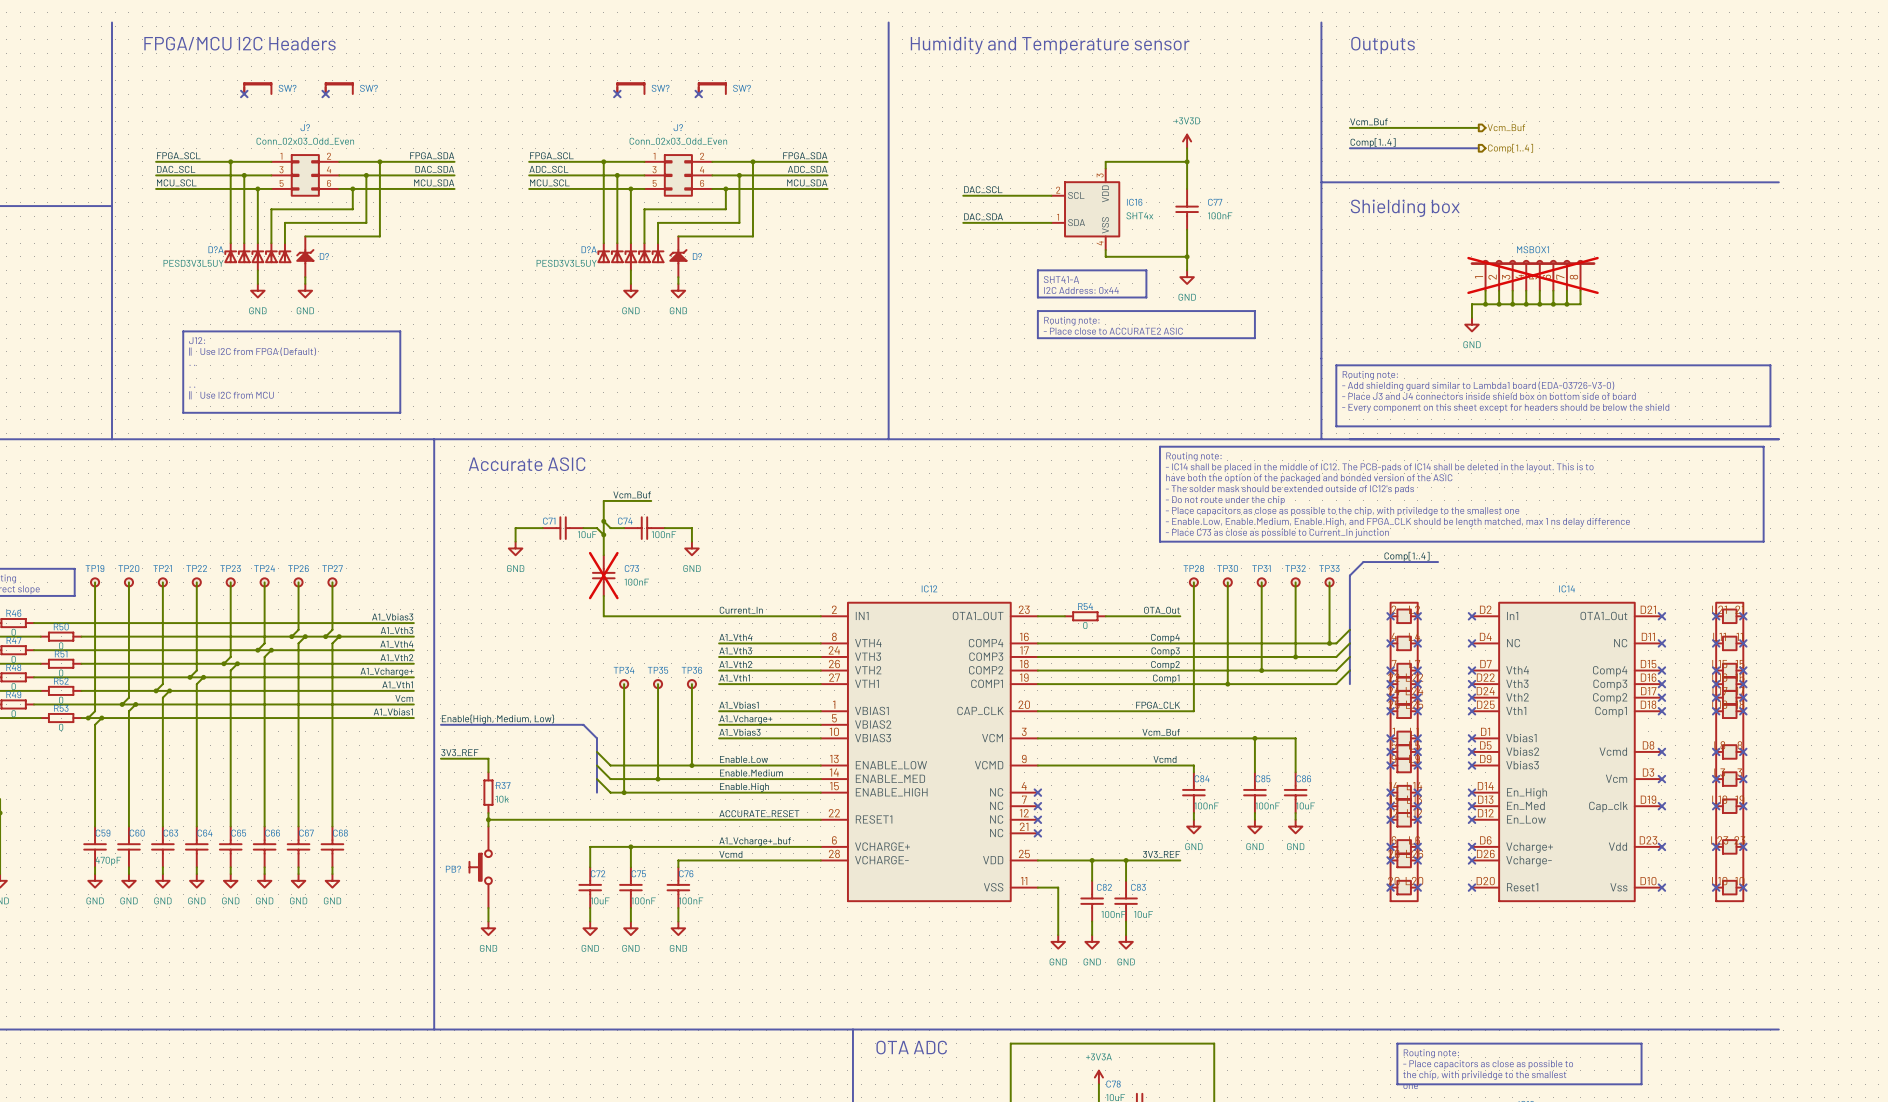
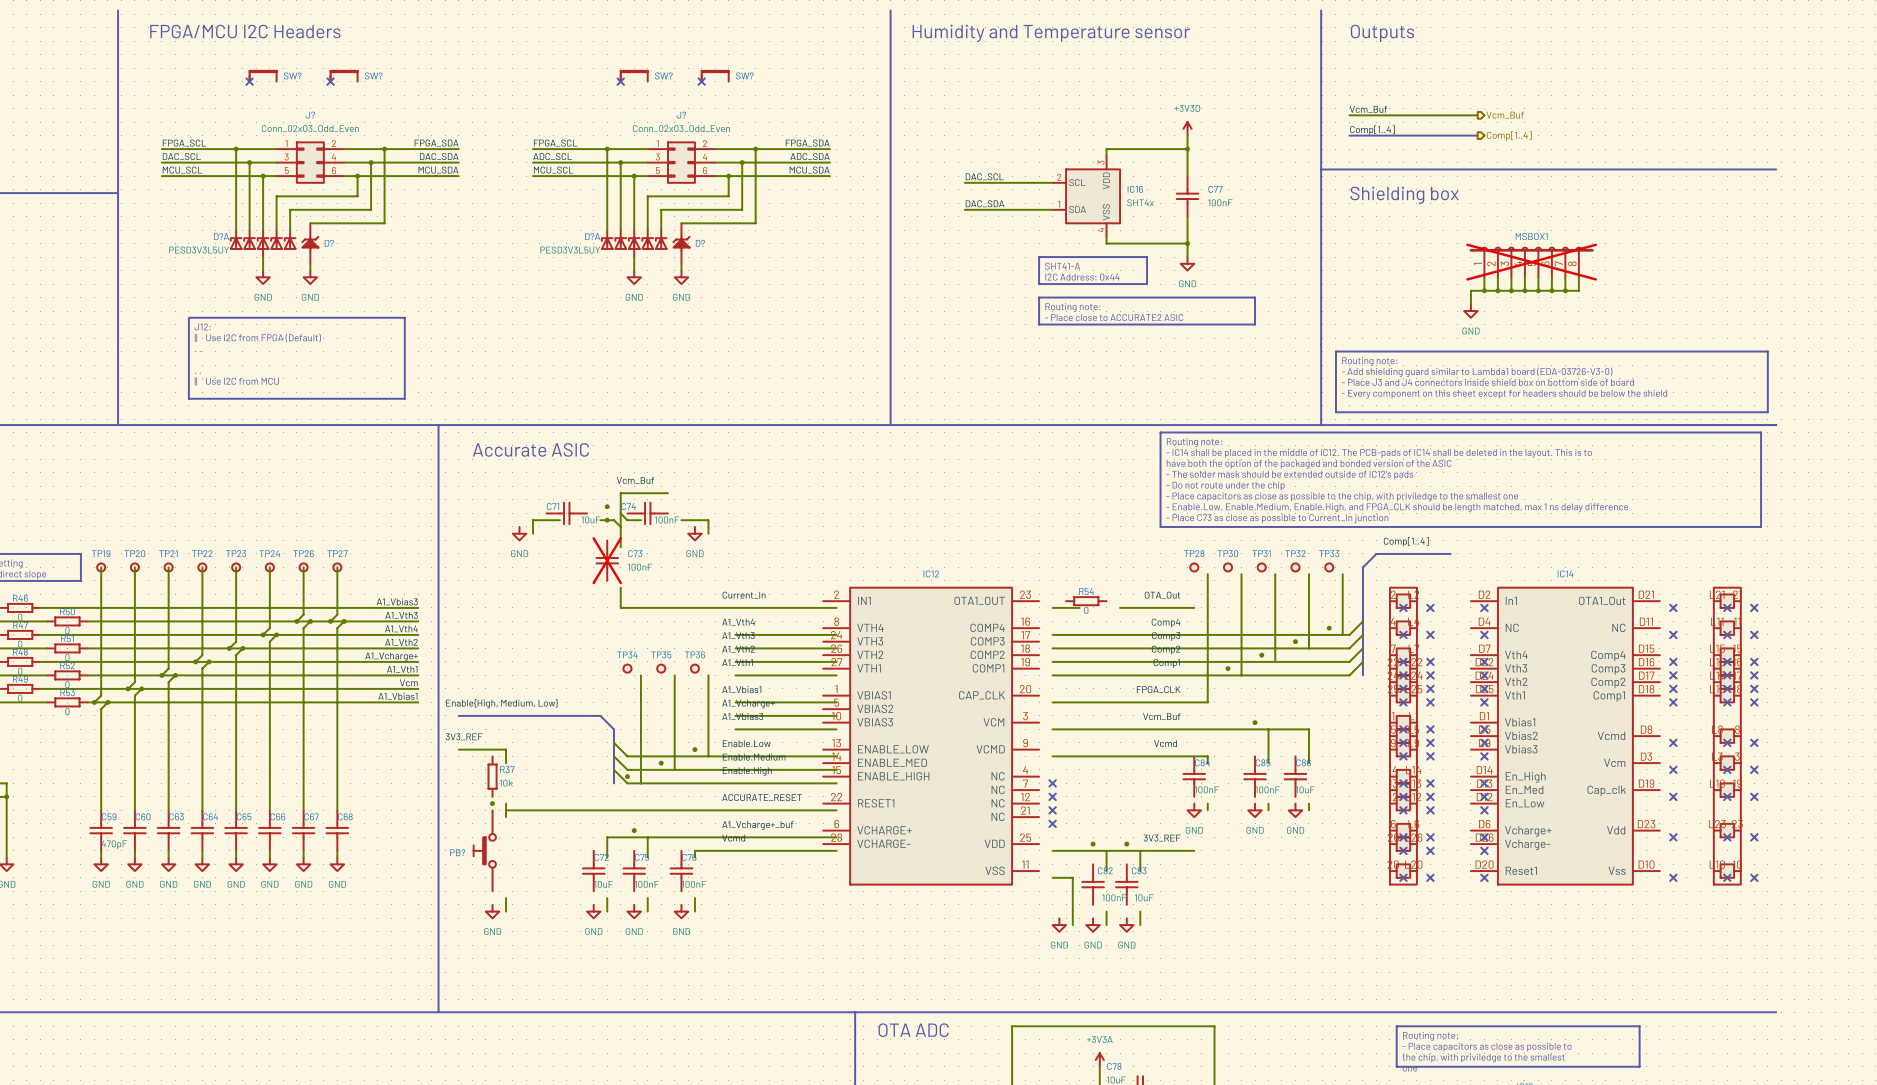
wire: (651, 500) (603, 500) (603, 555) -> (667, 493) (620, 493) (620, 547)
wire: (603, 521) (610, 528) (624, 528) -> (620, 513) (627, 520) (640, 520)
wire: (542, 528) (515, 528) (515, 541) -> (560, 520) (533, 520) (533, 533)
wire: (583, 528) (596, 528) (603, 534) -> (600, 520) (613, 520) (620, 526)
wire: (664, 528) (691, 528) (691, 541) -> (681, 520) (708, 520) (708, 533)
bus: (1438, 562) (1363, 562) (1349, 575) (1349, 684) -> (1450, 553) (1376, 553) (1362, 567) (1362, 675)
wire: (1193, 582) (1193, 711) (1037, 711) -> (1207, 574) (1207, 702) (1052, 702)
wire: (1227, 582) (1227, 684) -> (1241, 574) (1241, 675)
wire: (1261, 582) (1261, 670) -> (1275, 574) (1275, 661)
wire: (1295, 582) (1295, 656) -> (1308, 574) (1308, 648)
wire: (1329, 582) (1329, 643) -> (1342, 574) (1342, 634)
wire: (603, 595) (603, 616) (820, 616) -> (620, 587) (620, 607) (836, 607)
wire: (1037, 616) (1065, 616) -> (1052, 607) (1079, 607)
wire: (1105, 616) (1180, 616) -> (1120, 607) (1194, 607)
no-connect mark: (1390, 616) -> none
no-connect mark: (1417, 616) -> none
no-connect mark: (1471, 616) -> none
no-connect mark: (1661, 616) -> none
no-connect mark: (1716, 616) -> none
no-connect mark: (1743, 616) -> none
no-connect mark: none -> (1403, 607)
no-connect mark: none -> (1430, 607)
no-connect mark: none -> (1484, 607)
no-connect mark: none -> (1673, 607)
no-connect mark: none -> (1727, 607)
no-connect mark: none -> (1754, 607)
wire: (1349, 629) (1336, 643) (1037, 643) -> (1362, 621) (1349, 634) (1052, 634)
wire: (719, 643) (820, 643) -> (735, 634) (836, 634)
wire: (1349, 643) (1336, 656) (1037, 656) -> (1362, 634) (1349, 648) (1052, 648)
no-connect mark: (1390, 643) -> none
no-connect mark: (1417, 643) -> none
no-connect mark: (1471, 643) -> none
no-connect mark: (1661, 643) -> none
no-connect mark: (1716, 643) -> none
no-connect mark: (1743, 643) -> none
no-connect mark: none -> (1403, 634)
no-connect mark: none -> (1430, 634)
no-connect mark: none -> (1484, 634)
no-connect mark: none -> (1673, 634)
no-connect mark: none -> (1727, 634)
no-connect mark: none -> (1754, 634)
wire: (719, 656) (820, 656) -> (735, 648) (836, 648)
wire: (1349, 656) (1336, 670) (1037, 670) -> (1362, 648) (1349, 661) (1052, 661)
wire: (719, 670) (820, 670) -> (735, 661) (836, 661)
wire: (1349, 670) (1336, 684) (1037, 684) -> (1362, 661) (1349, 675) (1052, 675)
no-connect mark: (1390, 670) -> none
no-connect mark: (1417, 670) -> none
no-connect mark: (1471, 670) -> none
no-connect mark: (1661, 670) -> none
no-connect mark: (1716, 670) -> none
no-connect mark: (1743, 670) -> none
no-connect mark: none -> (1403, 661)
no-connect mark: none -> (1430, 661)
no-connect mark: none -> (1484, 661)
no-connect mark: none -> (1673, 661)
no-connect mark: none -> (1727, 661)
no-connect mark: none -> (1754, 661)
wire: (624, 684) (624, 792) -> (640, 675) (640, 783)
wire: (658, 684) (658, 779) -> (674, 675) (674, 769)
wire: (691, 684) (691, 765) -> (708, 675) (708, 756)
wire: (719, 684) (820, 684) -> (735, 675) (836, 675)
no-connect mark: (1390, 684) -> none
no-connect mark: (1417, 684) -> none
no-connect mark: (1471, 684) -> none
no-connect mark: (1661, 684) -> none
no-connect mark: (1716, 684) -> none
no-connect mark: (1743, 684) -> none
no-connect mark: none -> (1403, 675)
no-connect mark: none -> (1430, 675)
no-connect mark: none -> (1484, 675)
no-connect mark: none -> (1673, 675)
no-connect mark: none -> (1727, 675)
no-connect mark: none -> (1754, 675)
no-connect mark: (1390, 697) -> none
no-connect mark: (1417, 697) -> none
no-connect mark: (1471, 697) -> none
no-connect mark: (1661, 697) -> none
no-connect mark: (1716, 697) -> none
no-connect mark: (1743, 697) -> none
no-connect mark: none -> (1403, 688)
no-connect mark: none -> (1430, 688)
no-connect mark: none -> (1484, 688)
no-connect mark: none -> (1673, 688)
no-connect mark: none -> (1727, 688)
no-connect mark: none -> (1754, 688)
wire: (719, 711) (820, 711) -> (735, 702) (836, 702)
no-connect mark: (1390, 711) -> none
no-connect mark: (1417, 711) -> none
no-connect mark: (1471, 711) -> none
no-connect mark: (1661, 711) -> none
no-connect mark: (1716, 711) -> none
no-connect mark: (1743, 711) -> none
no-connect mark: none -> (1403, 702)
no-connect mark: none -> (1430, 702)
no-connect mark: none -> (1484, 702)
no-connect mark: none -> (1673, 702)
no-connect mark: none -> (1727, 702)
no-connect mark: none -> (1754, 702)
bus: (440, 724) (583, 724) (596, 738) (596, 792) -> (458, 715) (600, 715) (613, 729) (613, 783)
wire: (719, 724) (820, 724) -> (735, 715) (836, 715)
wire: (719, 738) (820, 738) -> (735, 729) (836, 729)
wire: (1037, 738) (1295, 738) (1295, 772) -> (1052, 729) (1308, 729) (1308, 763)
wire: (1254, 738) (1254, 772) -> (1268, 729) (1268, 763)
no-connect mark: (1390, 738) -> none
no-connect mark: (1417, 738) -> none
no-connect mark: (1471, 738) -> none
no-connect mark: none -> (1403, 729)
no-connect mark: none -> (1430, 729)
no-connect mark: none -> (1484, 729)
wire: (596, 751) (610, 765) (820, 765) -> (613, 742) (627, 756) (836, 756)
no-connect mark: (1390, 751) -> none
no-connect mark: (1417, 751) -> none
no-connect mark: (1471, 751) -> none
no-connect mark: (1661, 751) -> none
no-connect mark: (1716, 751) -> none
no-connect mark: (1743, 751) -> none
wire: (440, 758) (488, 758) (488, 772) -> (458, 749) (506, 749) (506, 763)
no-connect mark: none -> (1403, 742)
no-connect mark: none -> (1430, 742)
no-connect mark: none -> (1484, 742)
no-connect mark: none -> (1673, 742)
no-connect mark: none -> (1727, 742)
no-connect mark: none -> (1754, 742)
wire: (596, 765) (610, 779) (820, 779) -> (613, 756) (627, 769) (836, 769)
wire: (1037, 765) (1193, 765) (1193, 772) -> (1052, 756) (1207, 756) (1207, 763)
no-connect mark: (1390, 765) -> none
no-connect mark: (1417, 765) -> none
no-connect mark: (1471, 765) -> none
no-connect mark: none -> (1403, 756)
no-connect mark: none -> (1430, 756)
no-connect mark: none -> (1484, 756)
wire: (596, 779) (610, 792) (820, 792) -> (613, 769) (627, 783) (836, 783)
no-connect mark: (1661, 779) -> none
no-connect mark: (1716, 779) -> none
no-connect mark: (1743, 779) -> none
no-connect mark: none -> (1673, 769)
no-connect mark: none -> (1727, 769)
no-connect mark: none -> (1754, 769)
no-connect mark: (1037, 792) -> none
no-connect mark: (1390, 792) -> none
no-connect mark: (1417, 792) -> none
no-connect mark: (1471, 792) -> none
no-connect mark: none -> (1052, 783)
no-connect mark: none -> (1403, 783)
no-connect mark: none -> (1430, 783)
no-connect mark: none -> (1484, 783)
no-connect mark: (1037, 806) -> none
no-connect mark: (1390, 806) -> none
no-connect mark: (1417, 806) -> none
no-connect mark: (1471, 806) -> none
no-connect mark: (1661, 806) -> none
no-connect mark: (1716, 806) -> none
no-connect mark: (1743, 806) -> none
wire: (488, 812) (488, 826) -> (506, 803) (506, 817)
no-connect mark: none -> (1052, 796)
wire: (1193, 812) (1193, 819) -> (1207, 803) (1207, 810)
wire: (1254, 812) (1254, 819) -> (1268, 803) (1268, 810)
wire: (1295, 812) (1295, 819) -> (1308, 803) (1308, 810)
no-connect mark: none -> (1403, 796)
no-connect mark: none -> (1430, 796)
no-connect mark: none -> (1484, 796)
no-connect mark: none -> (1673, 796)
no-connect mark: none -> (1727, 796)
no-connect mark: none -> (1754, 796)
wire: (488, 819) (820, 819) -> (506, 810) (836, 810)
no-connect mark: (1037, 819) -> none
no-connect mark: (1390, 819) -> none
no-connect mark: (1417, 819) -> none
no-connect mark: (1471, 819) -> none
no-connect mark: none -> (1052, 810)
no-connect mark: none -> (1403, 810)
no-connect mark: none -> (1430, 810)
no-connect mark: none -> (1484, 810)
no-connect mark: (1037, 833) -> none
no-connect mark: none -> (1052, 823)
wire: (630, 846) (630, 867) -> (647, 837) (647, 857)
wire: (820, 846) (590, 846) (590, 867) -> (836, 837) (607, 837) (607, 857)
no-connect mark: (1390, 846) -> none
no-connect mark: (1417, 846) -> none
no-connect mark: (1471, 846) -> none
no-connect mark position: (1661, 846) -> (1673, 837)
no-connect mark: (1716, 846) -> none
no-connect mark: (1743, 846) -> none
no-connect mark: none -> (1403, 837)
no-connect mark: none -> (1430, 837)
no-connect mark: none -> (1484, 837)
no-connect mark: none -> (1727, 837)
no-connect mark: none -> (1754, 837)
wire: (820, 860) (678, 860) (678, 867) -> (836, 850) (694, 850) (694, 857)
wire: (1037, 860) (1180, 860) -> (1052, 850) (1194, 850)
wire: (1092, 860) (1092, 880) -> (1106, 850) (1106, 871)
wire: (1126, 860) (1126, 880) -> (1140, 850) (1140, 871)
no-connect mark: (1390, 860) -> none
no-connect mark: (1417, 860) -> none
no-connect mark: (1471, 860) -> none
no-connect mark: none -> (1403, 850)
no-connect mark: none -> (1430, 850)
no-connect mark: none -> (1484, 850)
wire: (1037, 887) (1058, 887) (1058, 935) -> (1052, 877) (1072, 877) (1072, 925)
no-connect mark: (1390, 887) -> none
no-connect mark: (1417, 887) -> none
no-connect mark: (1471, 887) -> none
no-connect mark position: (1661, 887) -> (1673, 877)
no-connect mark: (1716, 887) -> none
no-connect mark: (1743, 887) -> none
no-connect mark: none -> (1403, 877)
no-connect mark: none -> (1430, 877)
no-connect mark: none -> (1484, 877)
no-connect mark: none -> (1727, 877)
no-connect mark: none -> (1754, 877)
wire: (488, 907) (488, 921) -> (506, 898) (506, 911)
wire: (590, 907) (590, 921) -> (607, 898) (607, 911)
wire: (630, 907) (630, 921) -> (647, 898) (647, 911)
wire: (678, 907) (678, 921) -> (694, 898) (694, 911)
wire: (1092, 921) (1092, 935) -> (1106, 911) (1106, 925)
wire: (1126, 921) (1126, 935) -> (1140, 911) (1140, 925)

